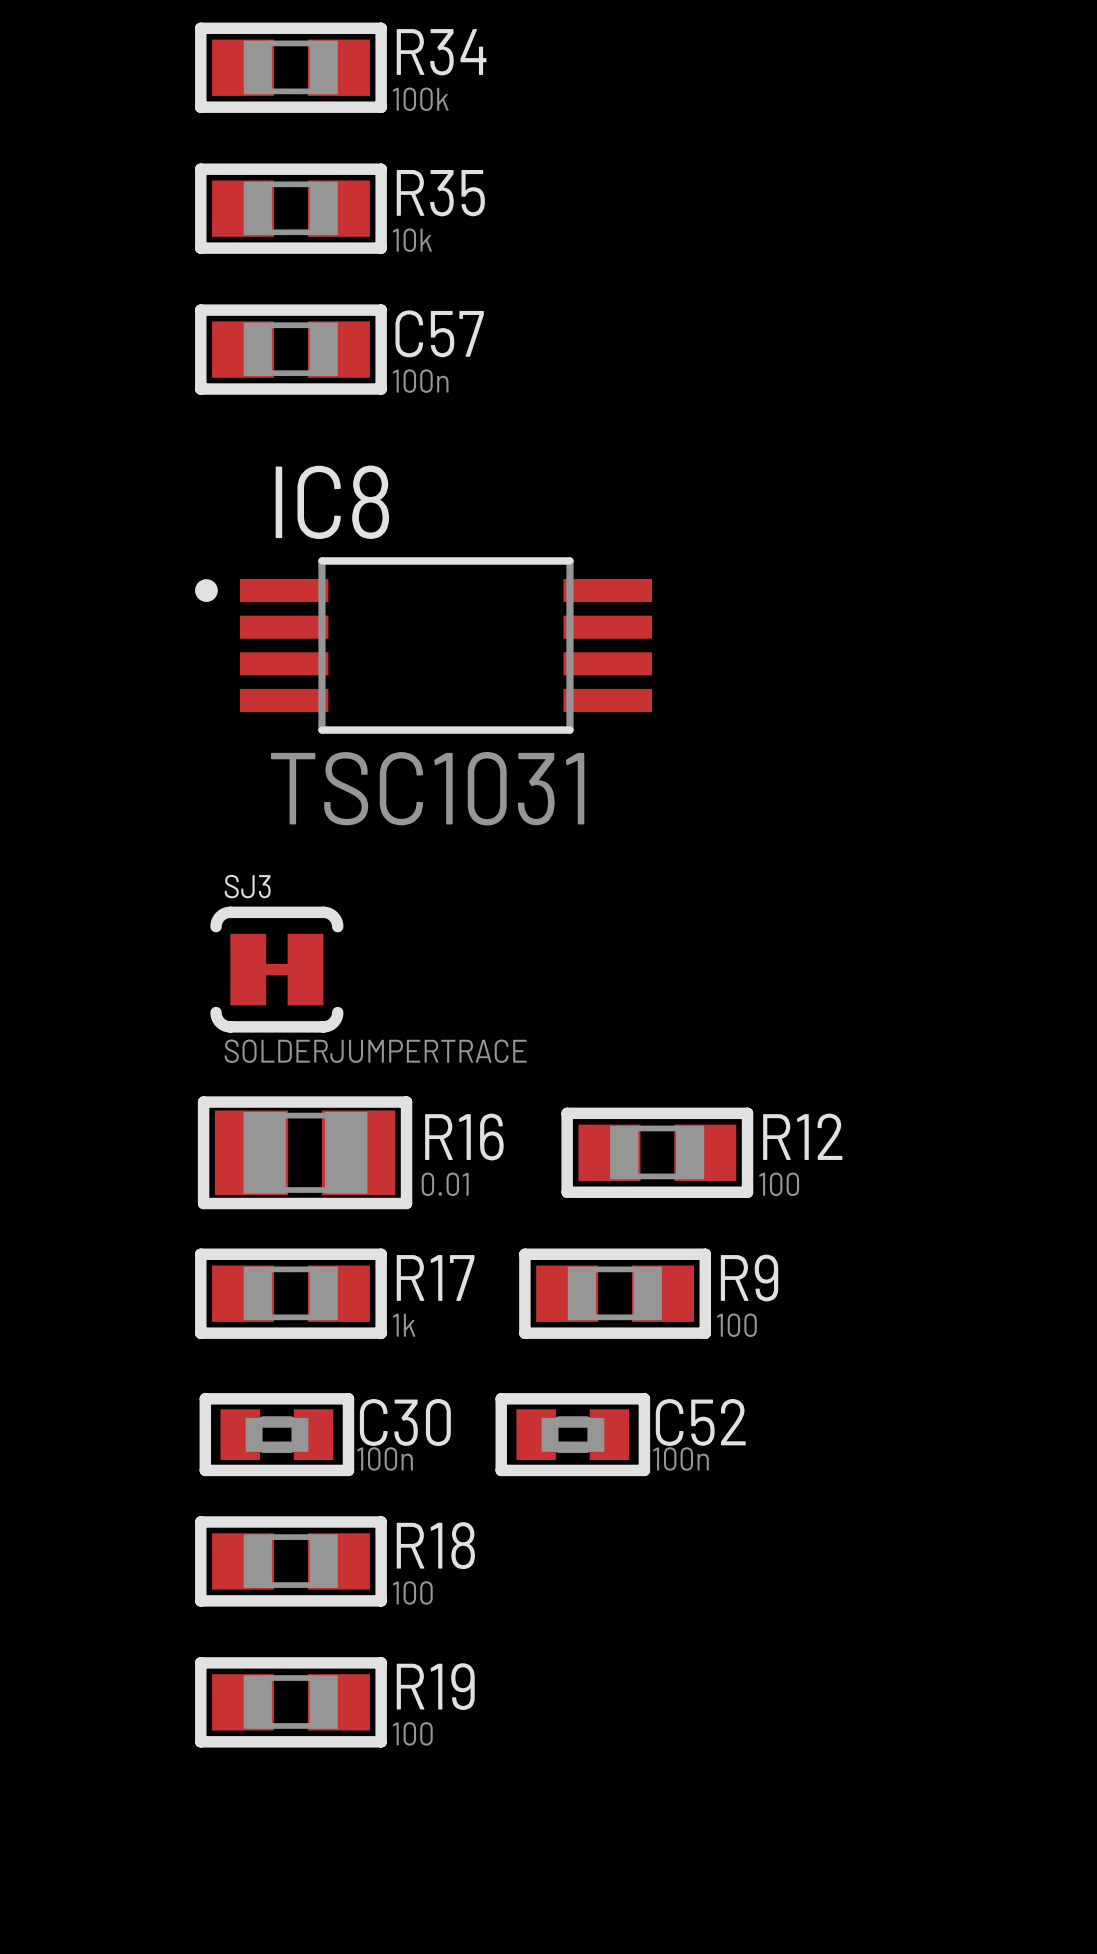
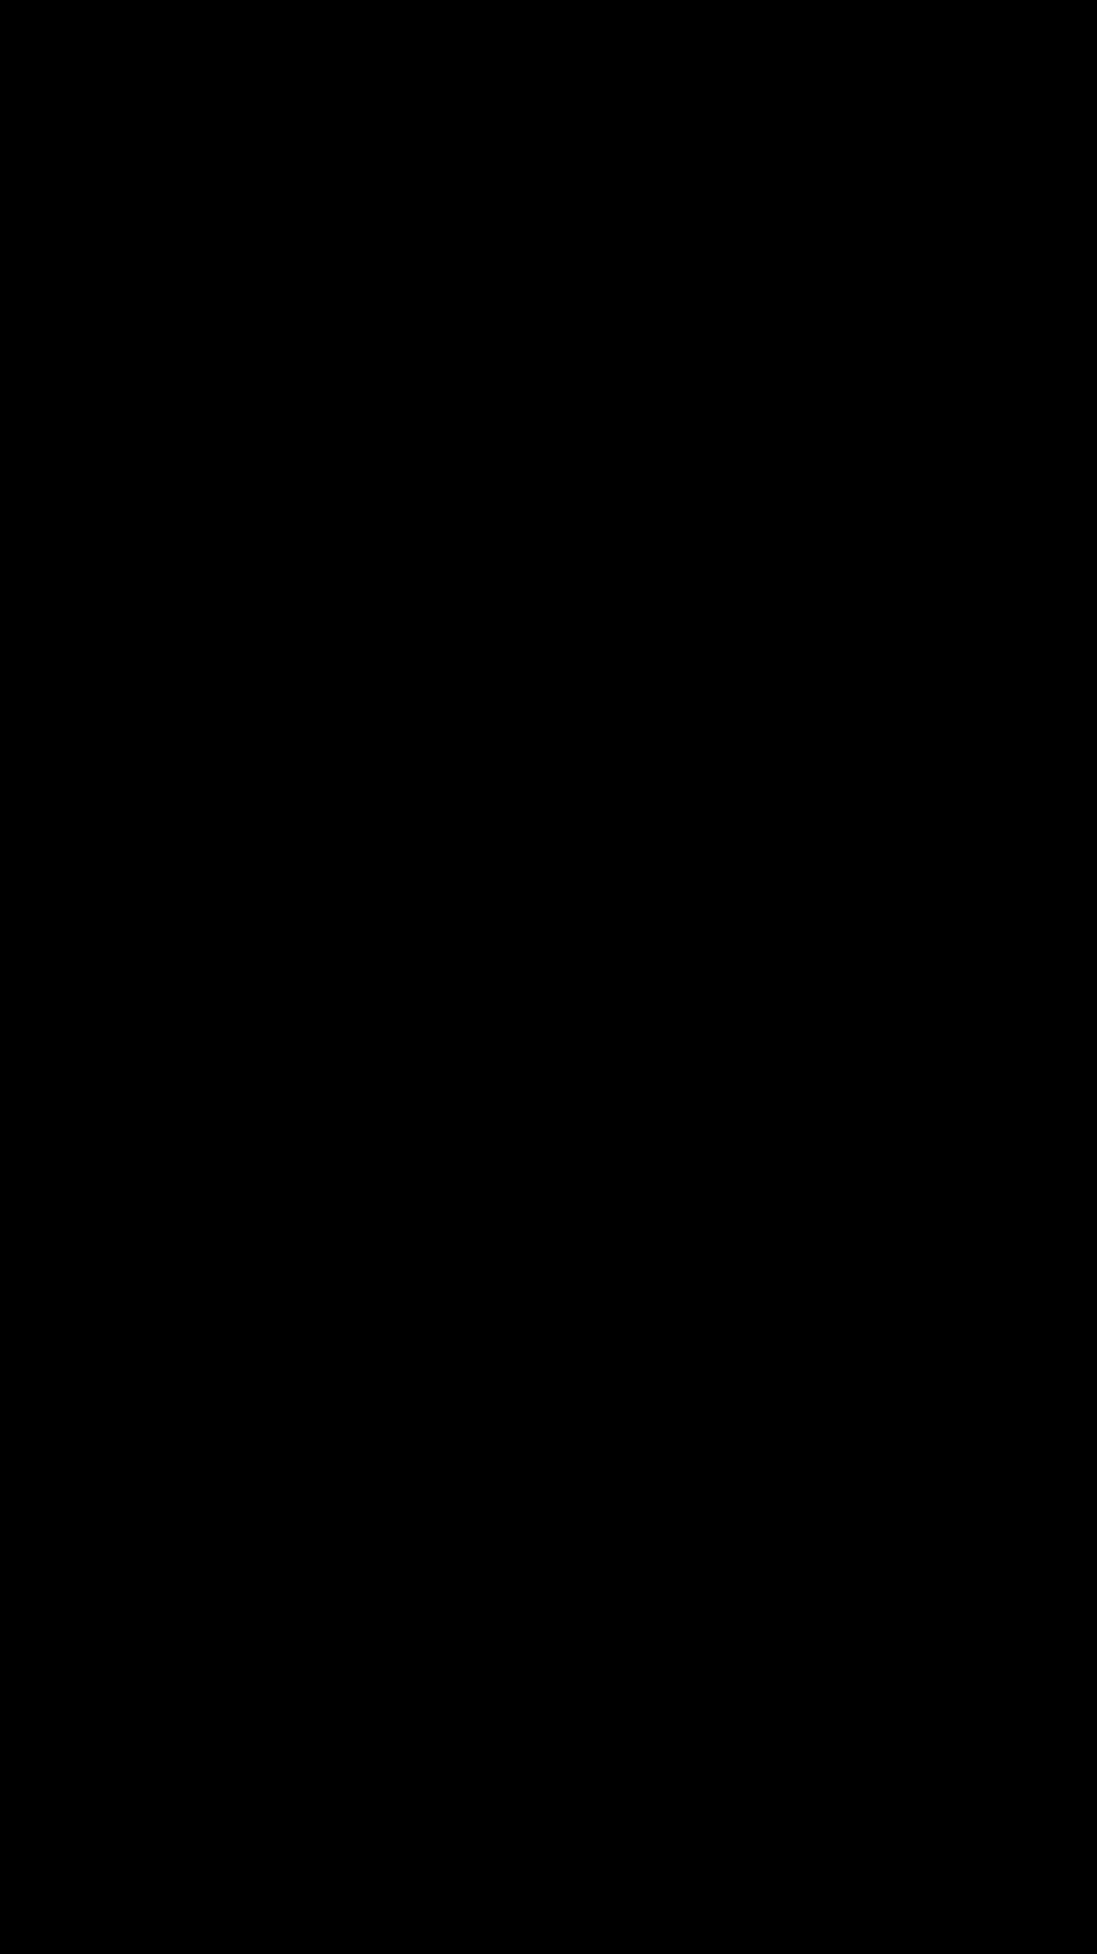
R34: 100k (290, 67) -> none
R35: 10k (290, 208) -> none
C57: 100n (290, 349) -> none
IC8: TSC1031 (423, 645) -> none
SJ3: SOLDERJUMPERTRACE (276, 969) -> none
R16: 0.01 (305, 1152) -> none
R12: 100 (657, 1152) -> none
R17: 1k (290, 1293) -> none
R9: 100 (615, 1293) -> none
C30: 100n (276, 1434) -> none
C52: 100n (572, 1434) -> none
R18: 100 (290, 1561) -> none
R19: 100 (290, 1702) -> none

